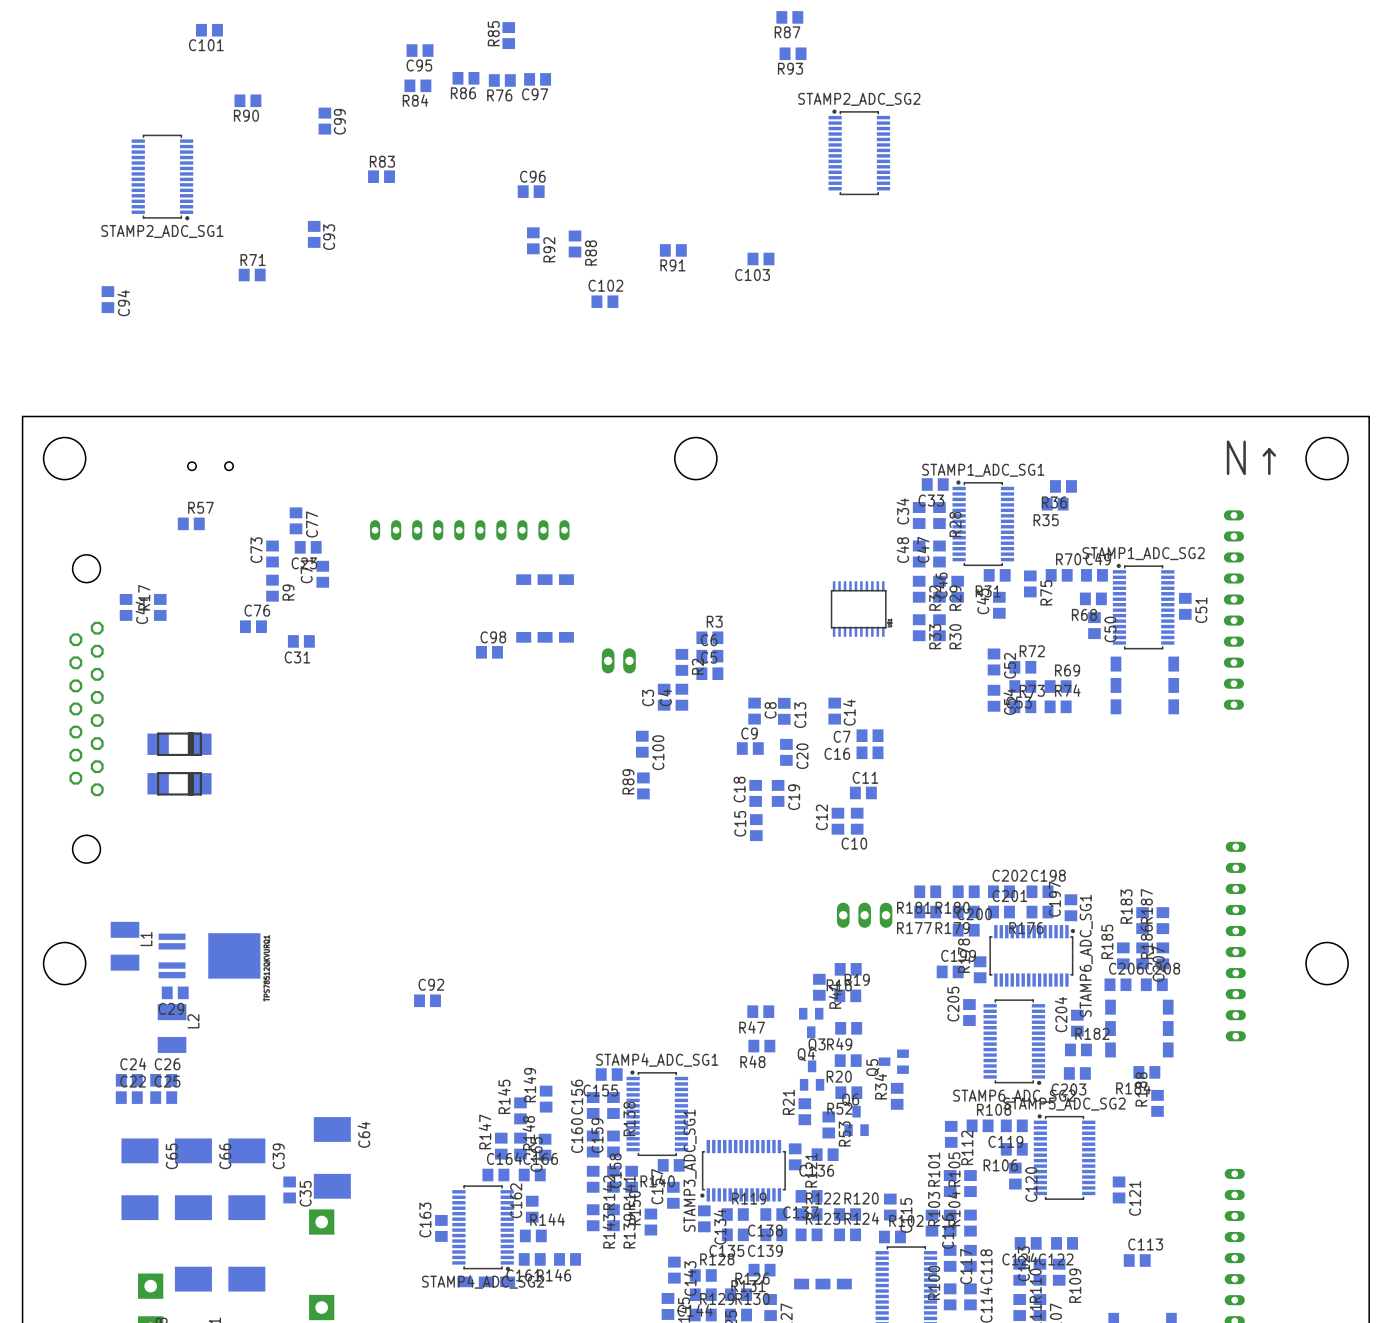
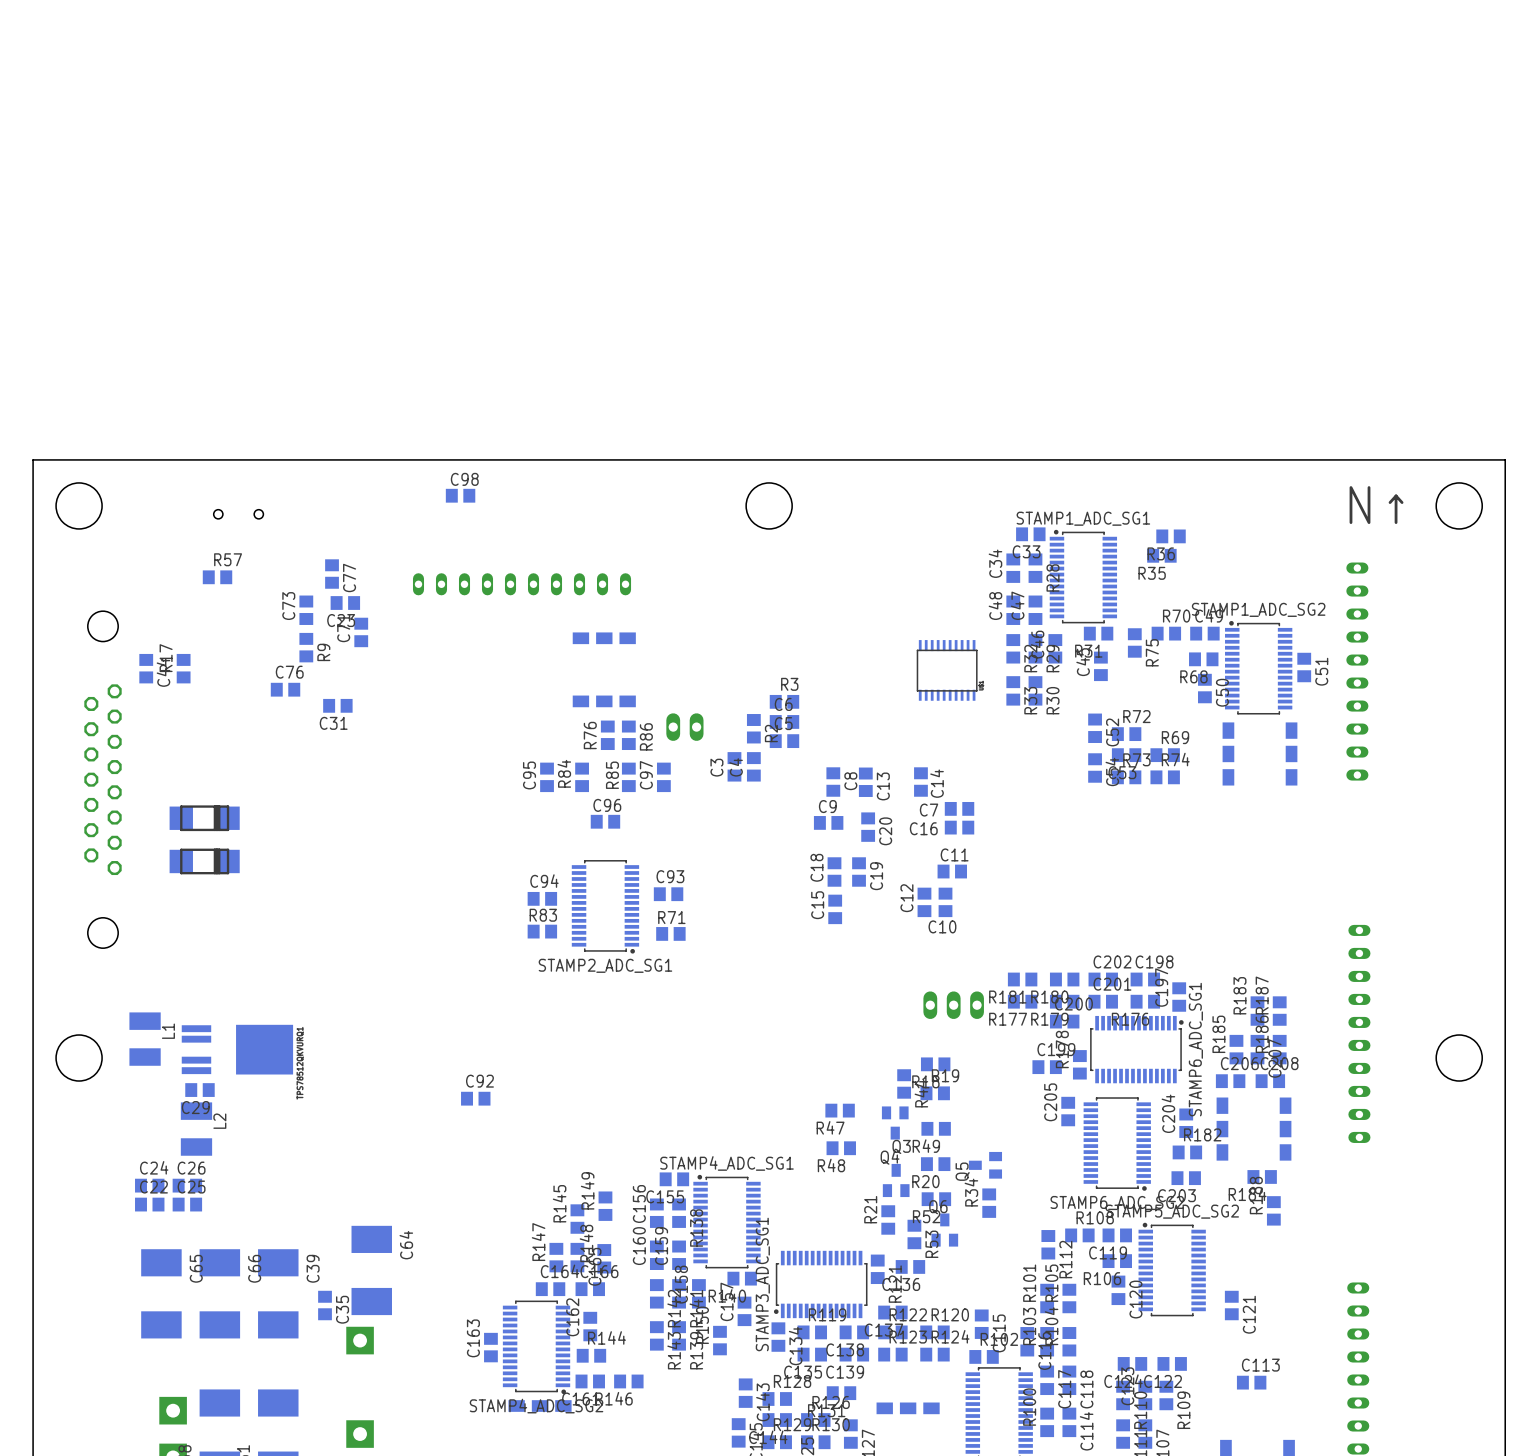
R87: (789, 17) -> none
C101: (209, 30) -> none
R85 position: (508, 35) -> (628, 777)
C95 rotation: 0° (420, 50) -> 90° clockwise (547, 777)
C95 position: (420, 50) -> (547, 777)
R93: (793, 53) -> none
R86 rotation: 0° (465, 78) -> 90° clockwise (628, 735)
R86 position: (465, 78) -> (628, 735)
C97 rotation: 0° (537, 79) -> 90° clockwise (663, 777)
C97 position: (537, 79) -> (663, 777)
R76 rotation: 0° (502, 80) -> 90° clockwise (607, 735)
R76 position: (502, 80) -> (607, 735)
R84 rotation: 0° (417, 85) -> 90° clockwise (582, 777)
R84 position: (417, 85) -> (582, 777)
R86 name position: R86 (463, 93) -> R86 (646, 736)
R90: (247, 100) -> none
C99: (324, 121) -> none
STAMP2_ADC_SG2: (859, 152) -> none
R83 position: (381, 176) -> (542, 931)
STAMP2_ADC_SG1 position: (162, 177) -> (605, 906)
C96 position: (531, 191) -> (605, 821)
C93 rotation: 0° (314, 234) -> 90° clockwise (668, 894)
C93 position: (314, 234) -> (668, 894)
C93 name position: C93 (329, 237) -> C93 (670, 876)
R92: (533, 240) -> none
R88: (575, 244) -> none
R91: (673, 250) -> none
C103: (760, 258) -> none
R71 position: (252, 275) -> (670, 933)
C94 rotation: 0° (107, 299) -> 90° clockwise (542, 898)
C94 position: (107, 299) -> (542, 898)
C102: (604, 301) -> none
C94 name position: C94 (123, 303) -> C94 (544, 881)
C98 position: (489, 652) -> (460, 495)
C100: (642, 744) -> none
R89: (643, 785) -> none

